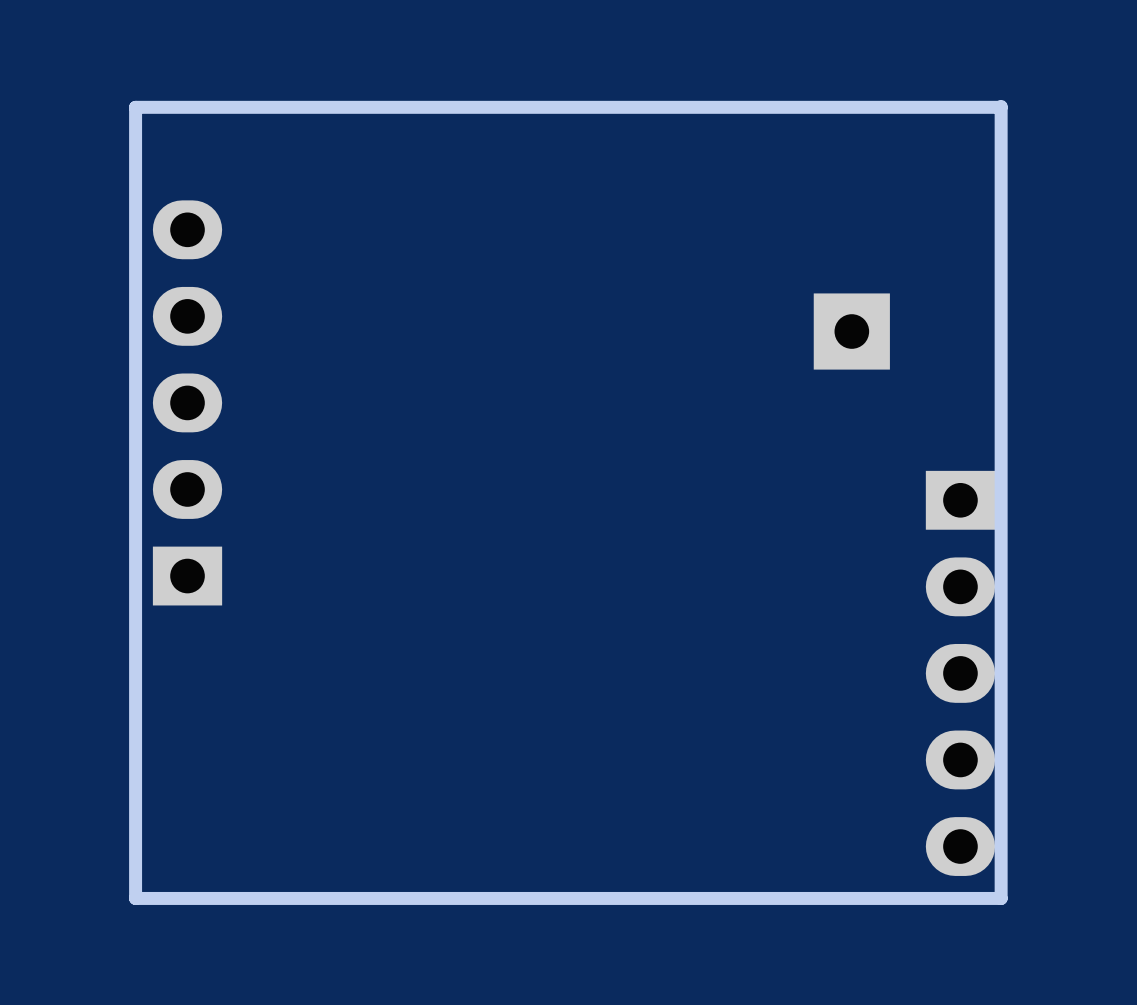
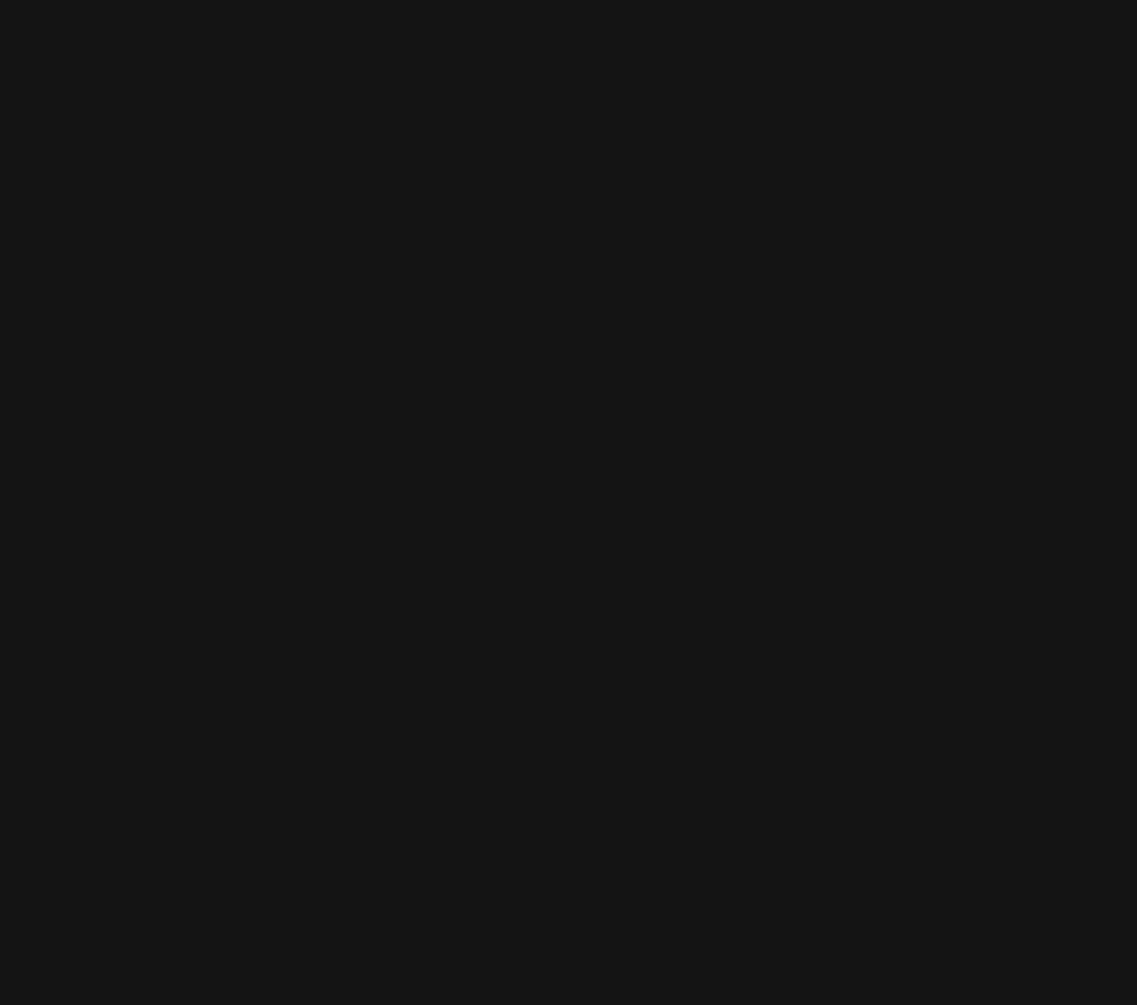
board edge: (1001, 106) (1001, 898) (135, 898) (135, 107) (1001, 107) -> none
part: (851, 331) -> none
part: (187, 402) -> none
part: (960, 673) -> none

